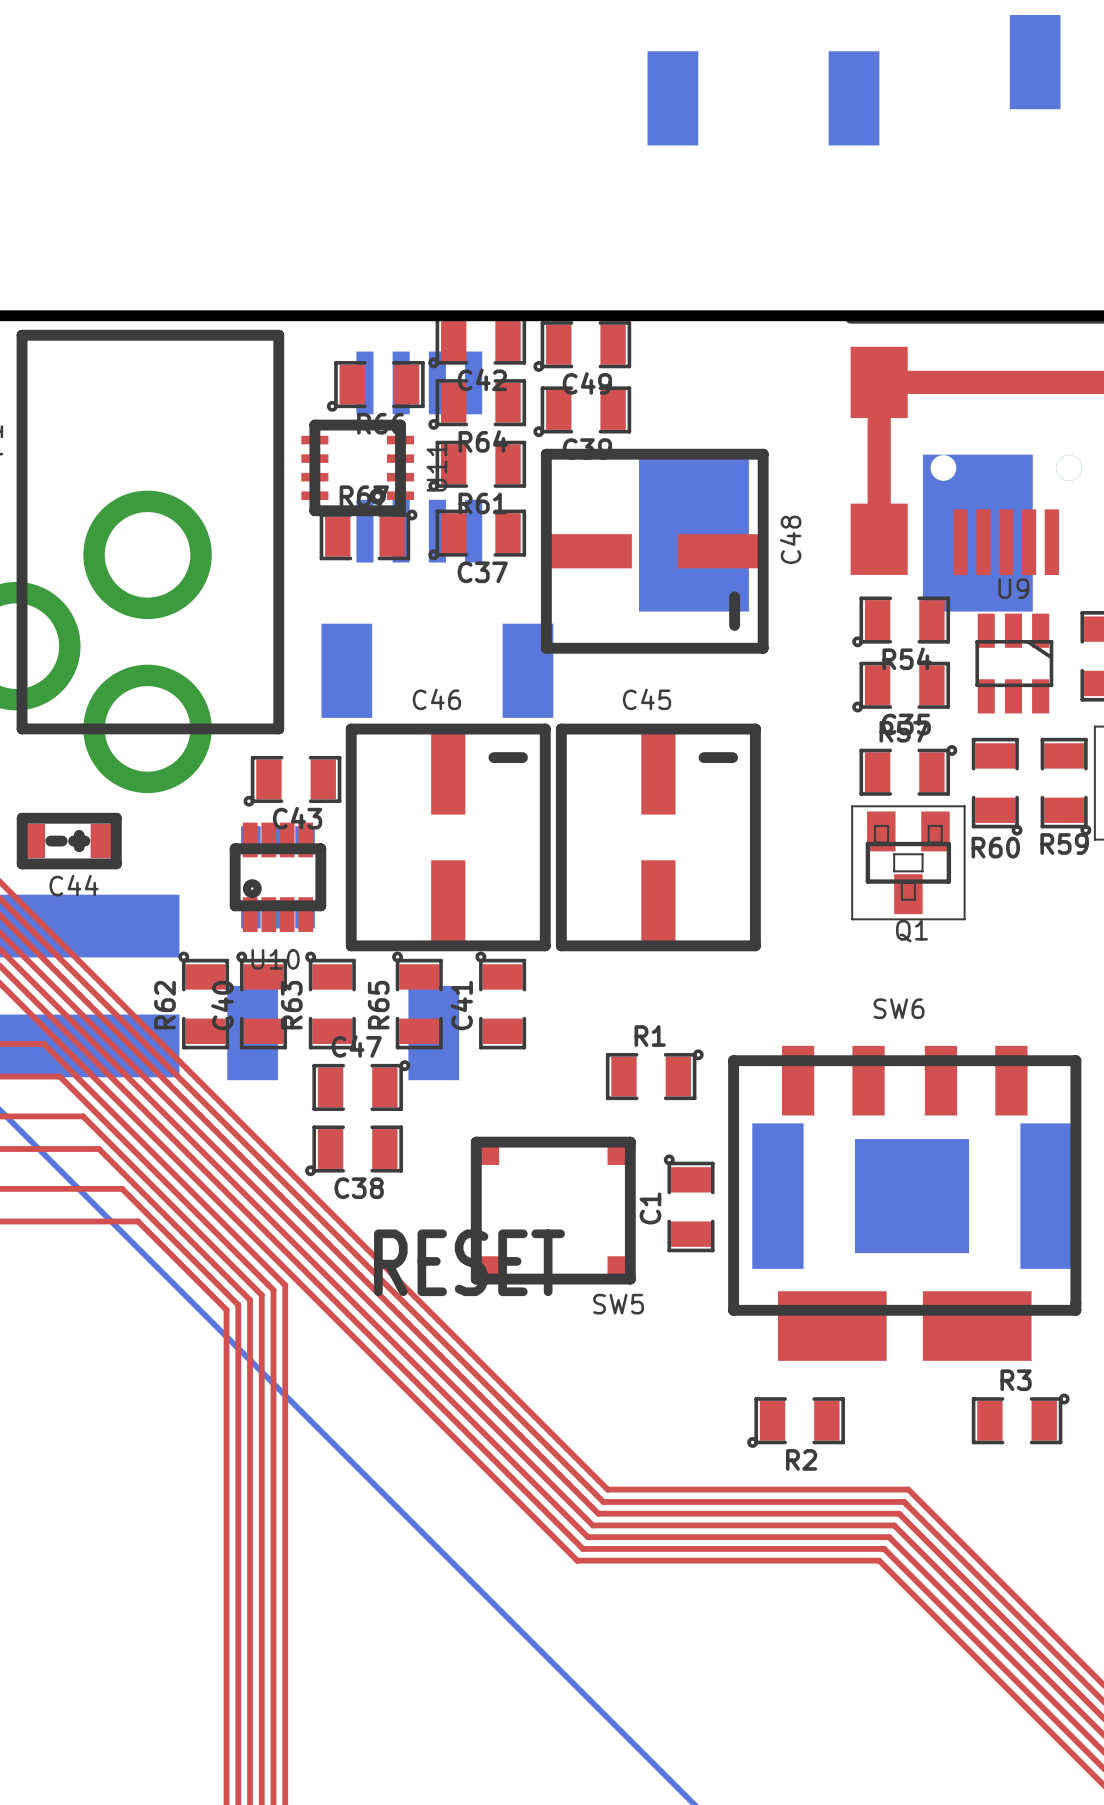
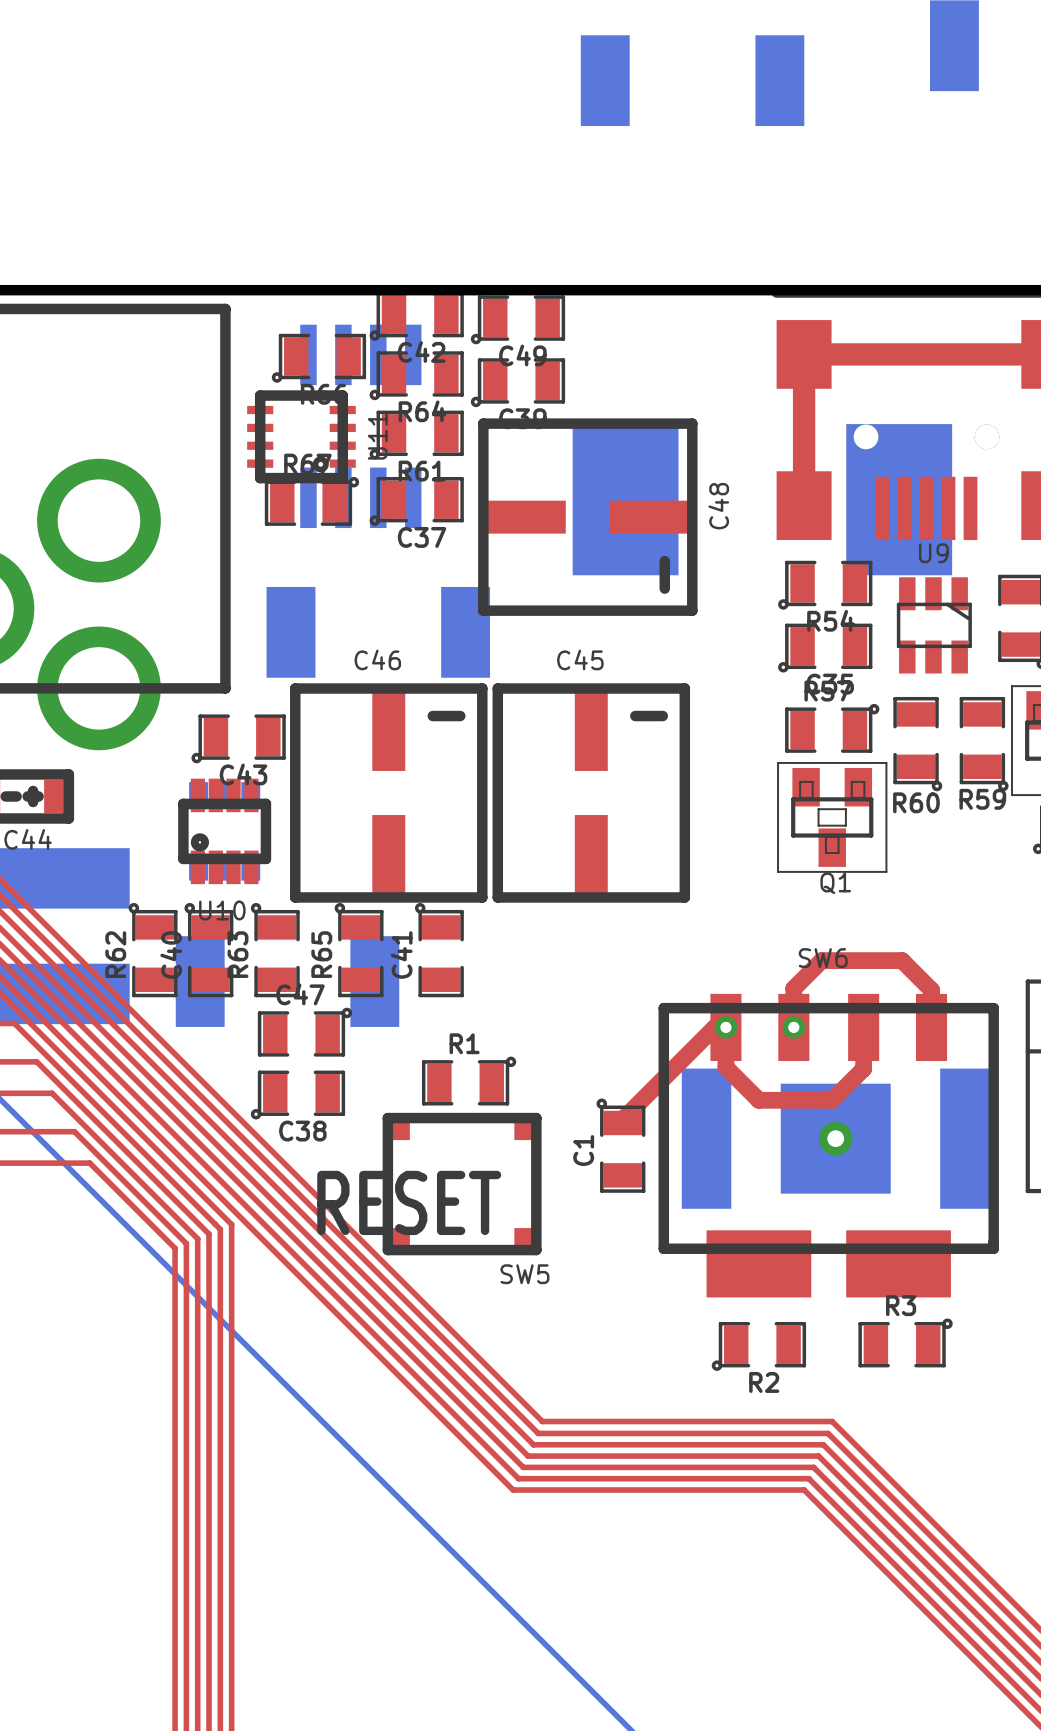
R1 position: (654, 1074) -> (469, 1081)
via: none -> (725, 1027)
top track: none -> (793, 1027) (793, 988) (821, 960) (902, 960) (931, 990) (931, 1027)
via: none -> (793, 1027)
top track: none -> (863, 1027) (863, 1068) (832, 1100) (758, 1100) (725, 1067) (725, 1027) (714, 1027) (615, 1126)
via: none -> (835, 1138)
SW5 position: (553, 1210) -> (462, 1184)
R3 position: (1020, 1418) -> (905, 1342)
R2 position: (796, 1422) -> (758, 1346)

